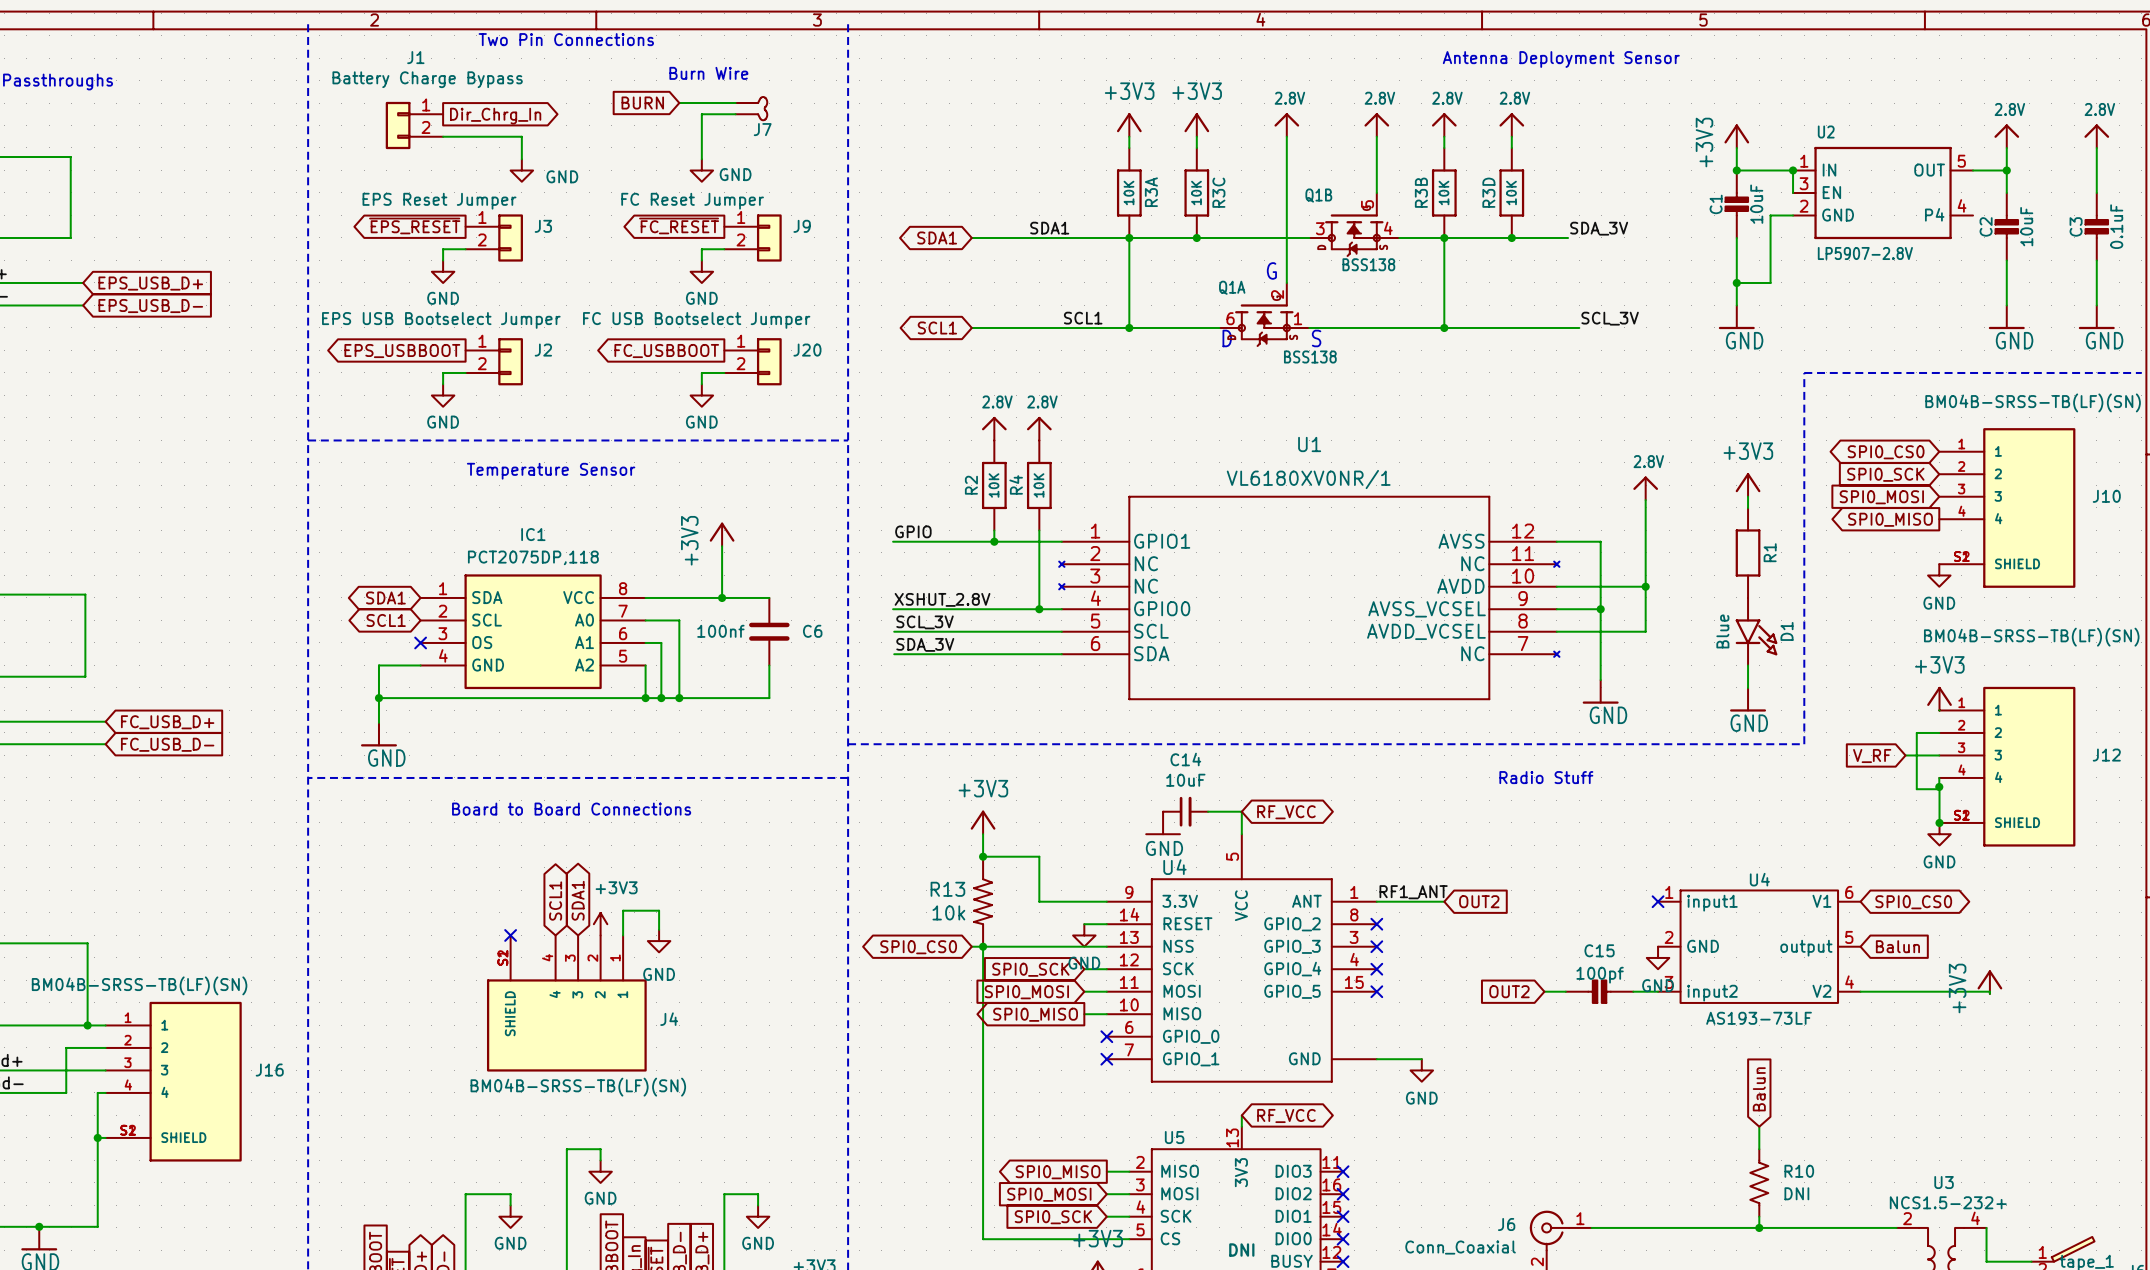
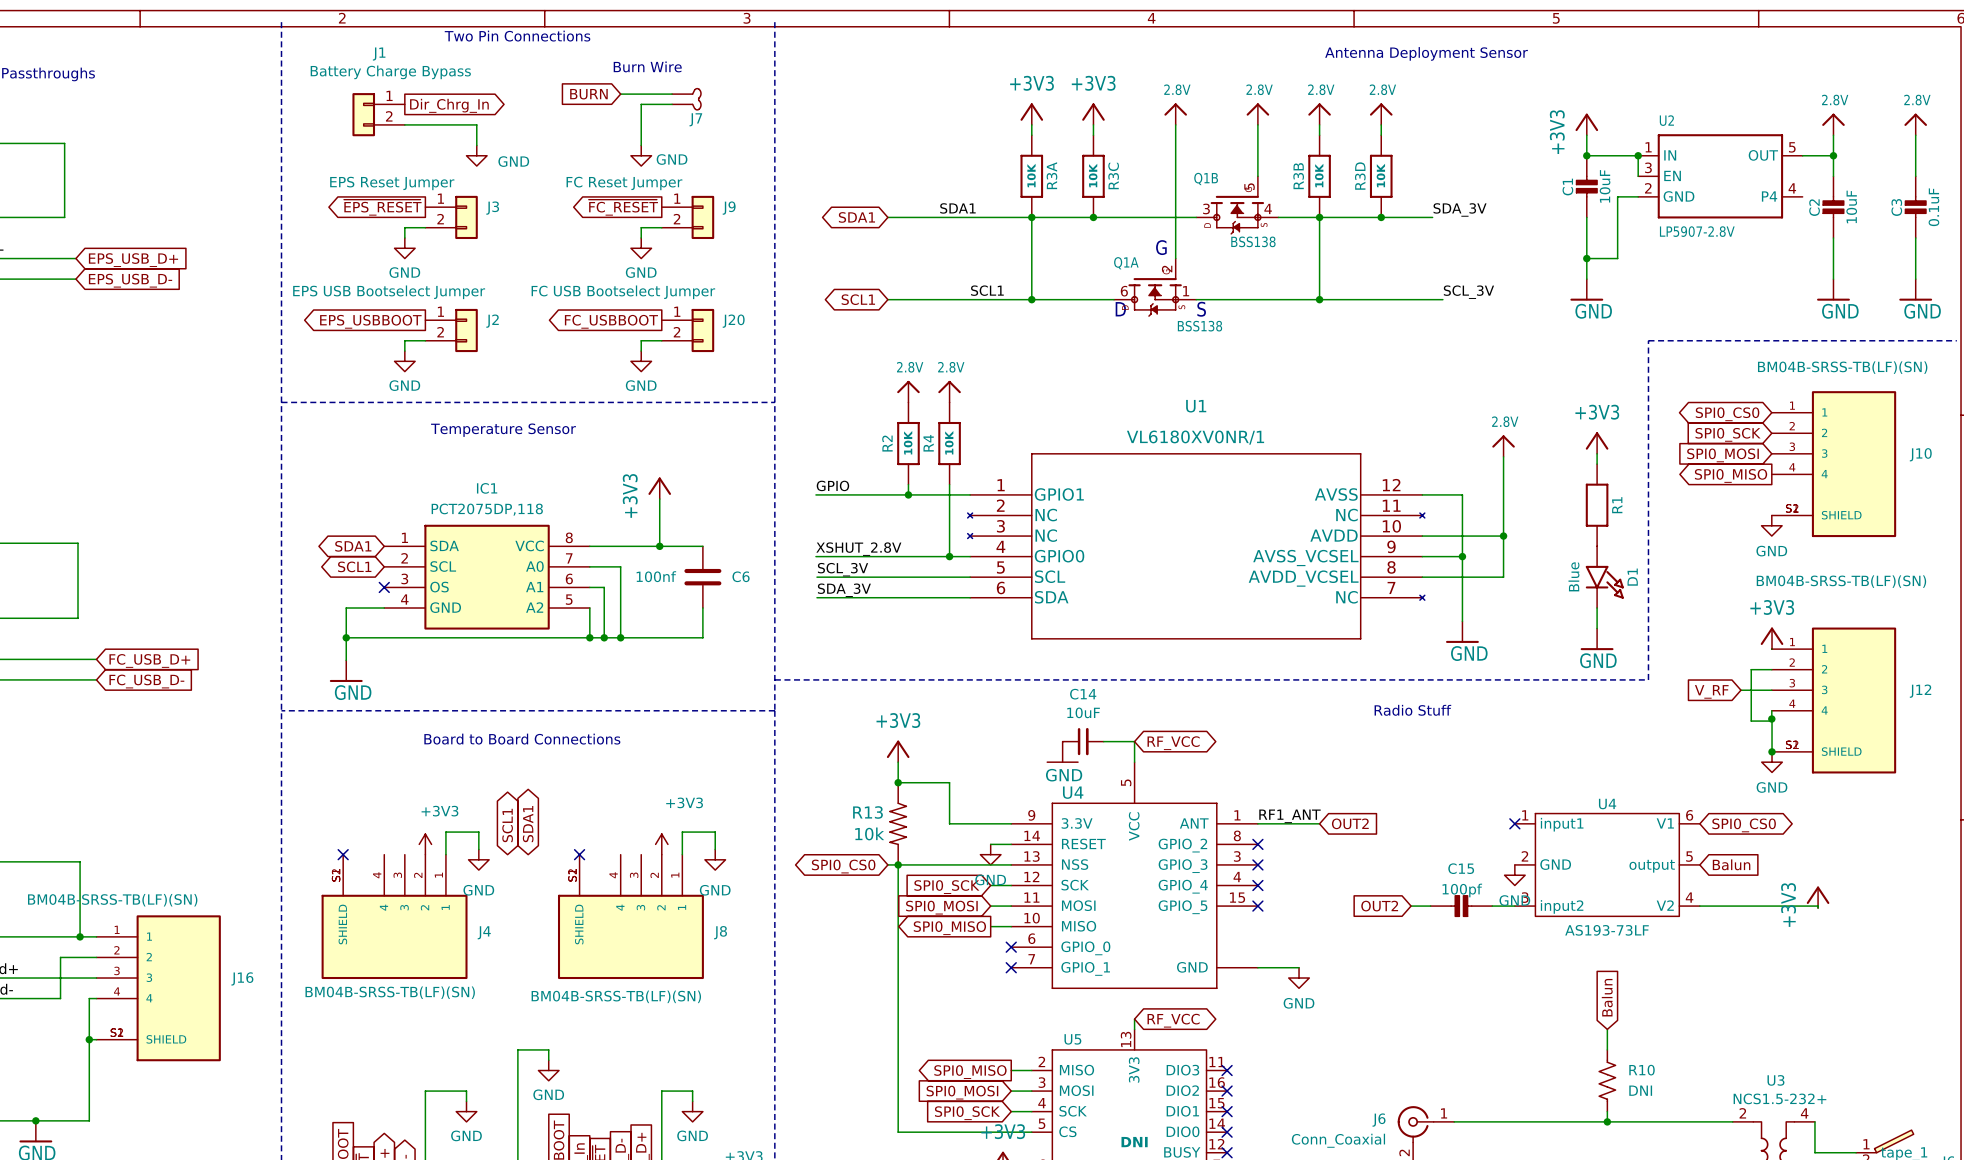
power symbol: none -> +3V3 (425, 844)
power symbol: +3V3 (600, 924) -> none
power symbol: none -> +3V3 (661, 844)
wire: none -> (478, 849) (478, 832) (445, 832) (445, 854)
wire: (659, 929) (659, 910) (623, 910) (623, 935) -> (715, 849) (715, 832) (682, 832) (682, 854)
no-connect mark: none -> (343, 854)
no-connect mark: (510, 935) -> none
no-connect mark: none -> (579, 854)
power symbol: none -> GND (478, 859)
power symbol: GND (659, 941) -> none
power symbol: none -> GND (715, 859)
J4 position: (566, 1003) -> (394, 916)
J8: none -> BM04B-SRSS-TB(LF)(SN) (630, 916)

